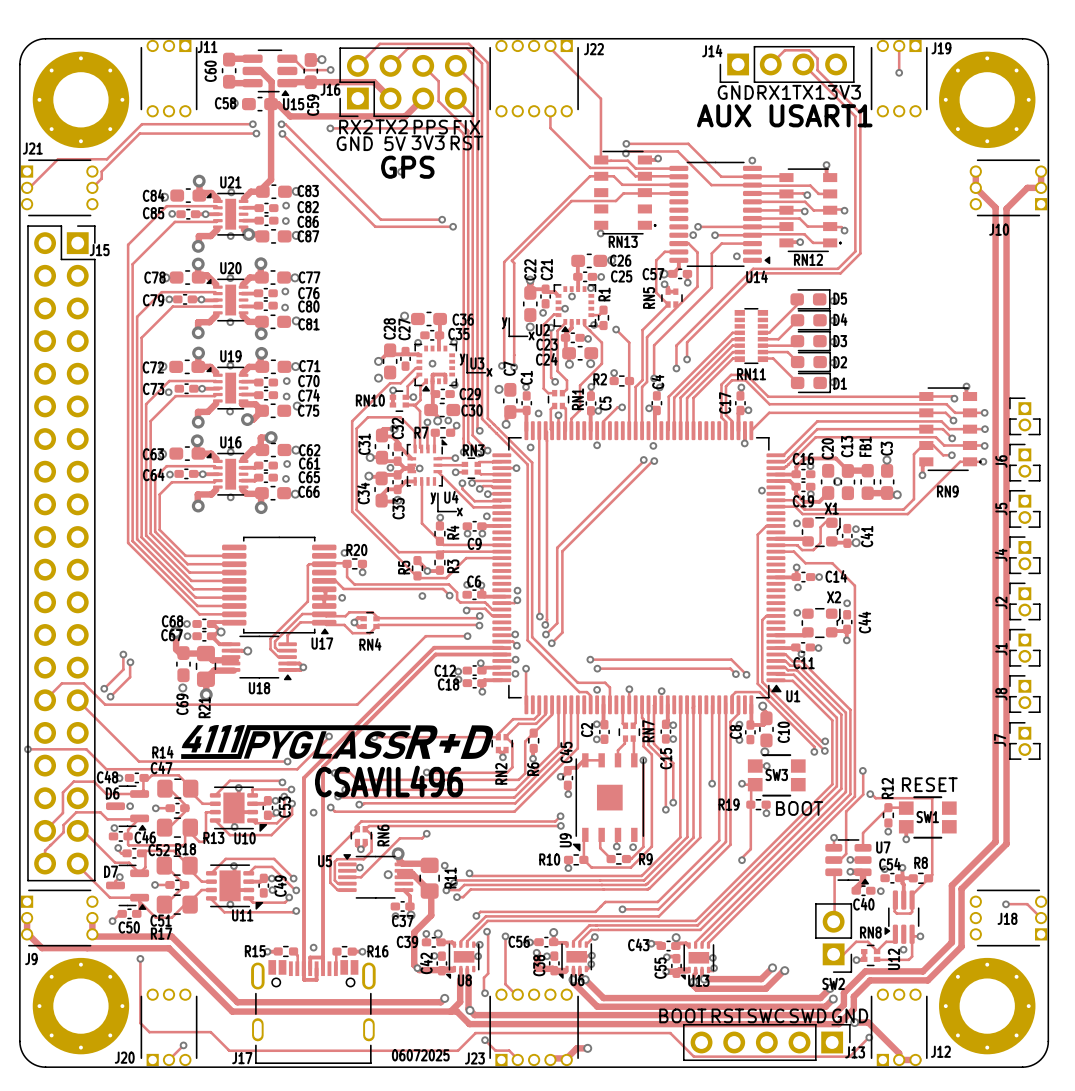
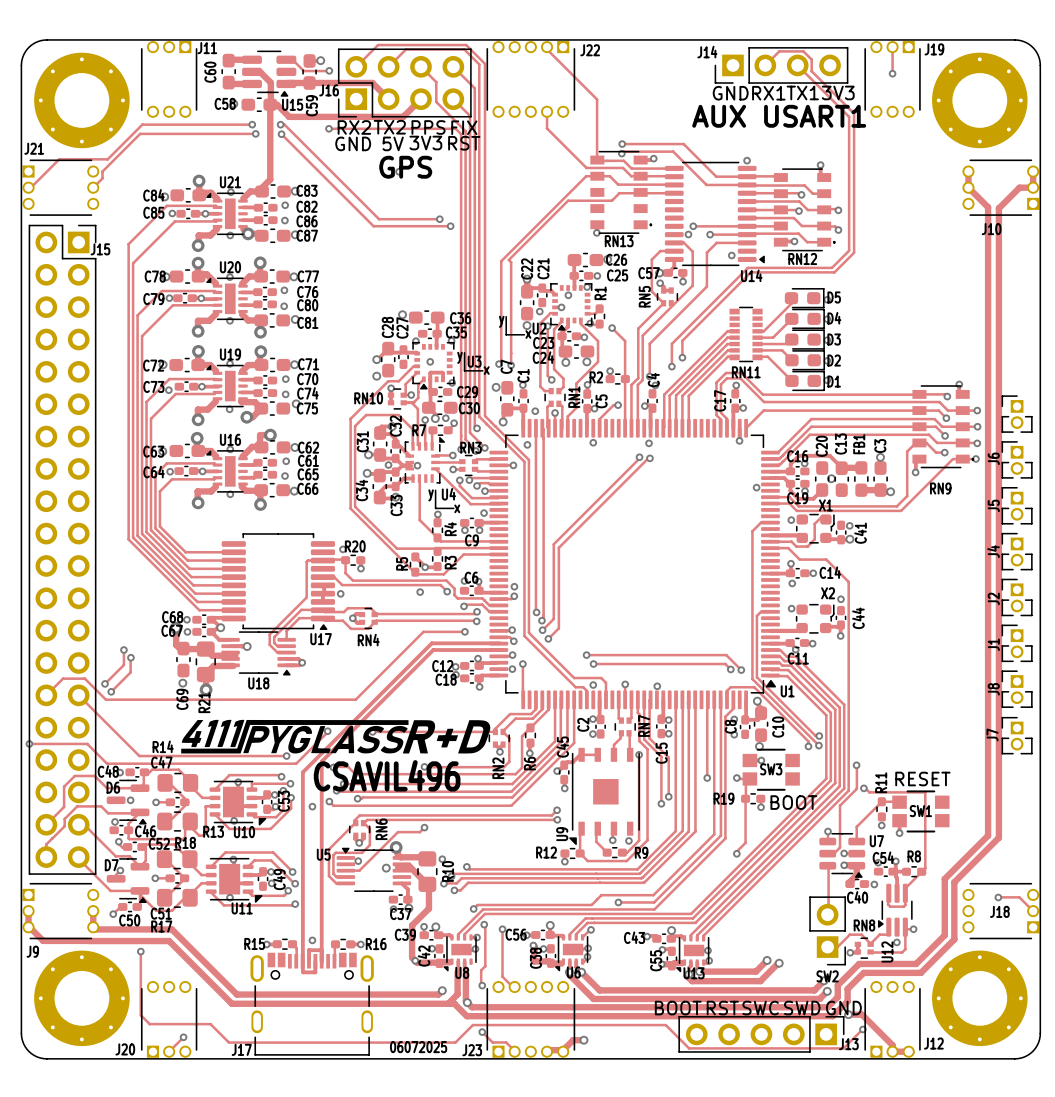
R12 name: R12 (887, 788) -> R11 (881, 782)
R10 name: R10 (549, 859) -> R12 (546, 852)
R11 name: R11 (450, 878) -> R10 (448, 871)

